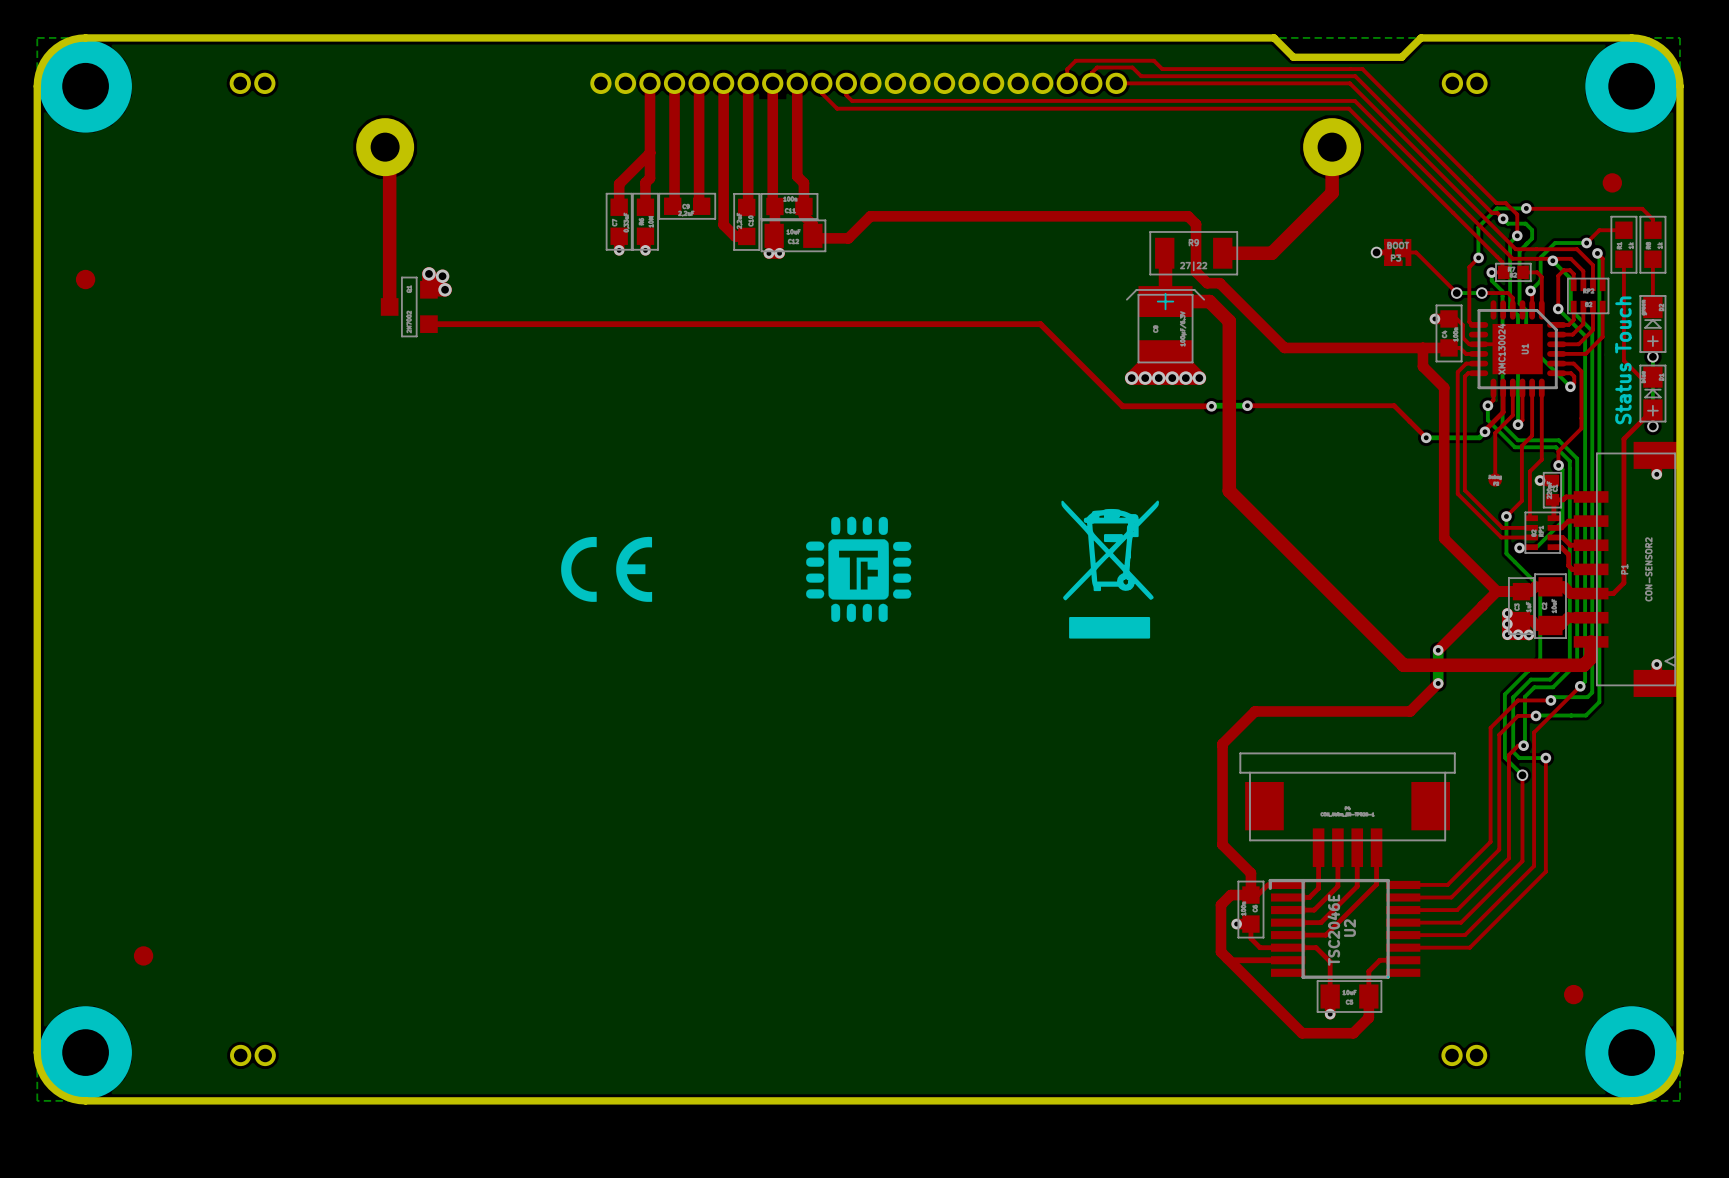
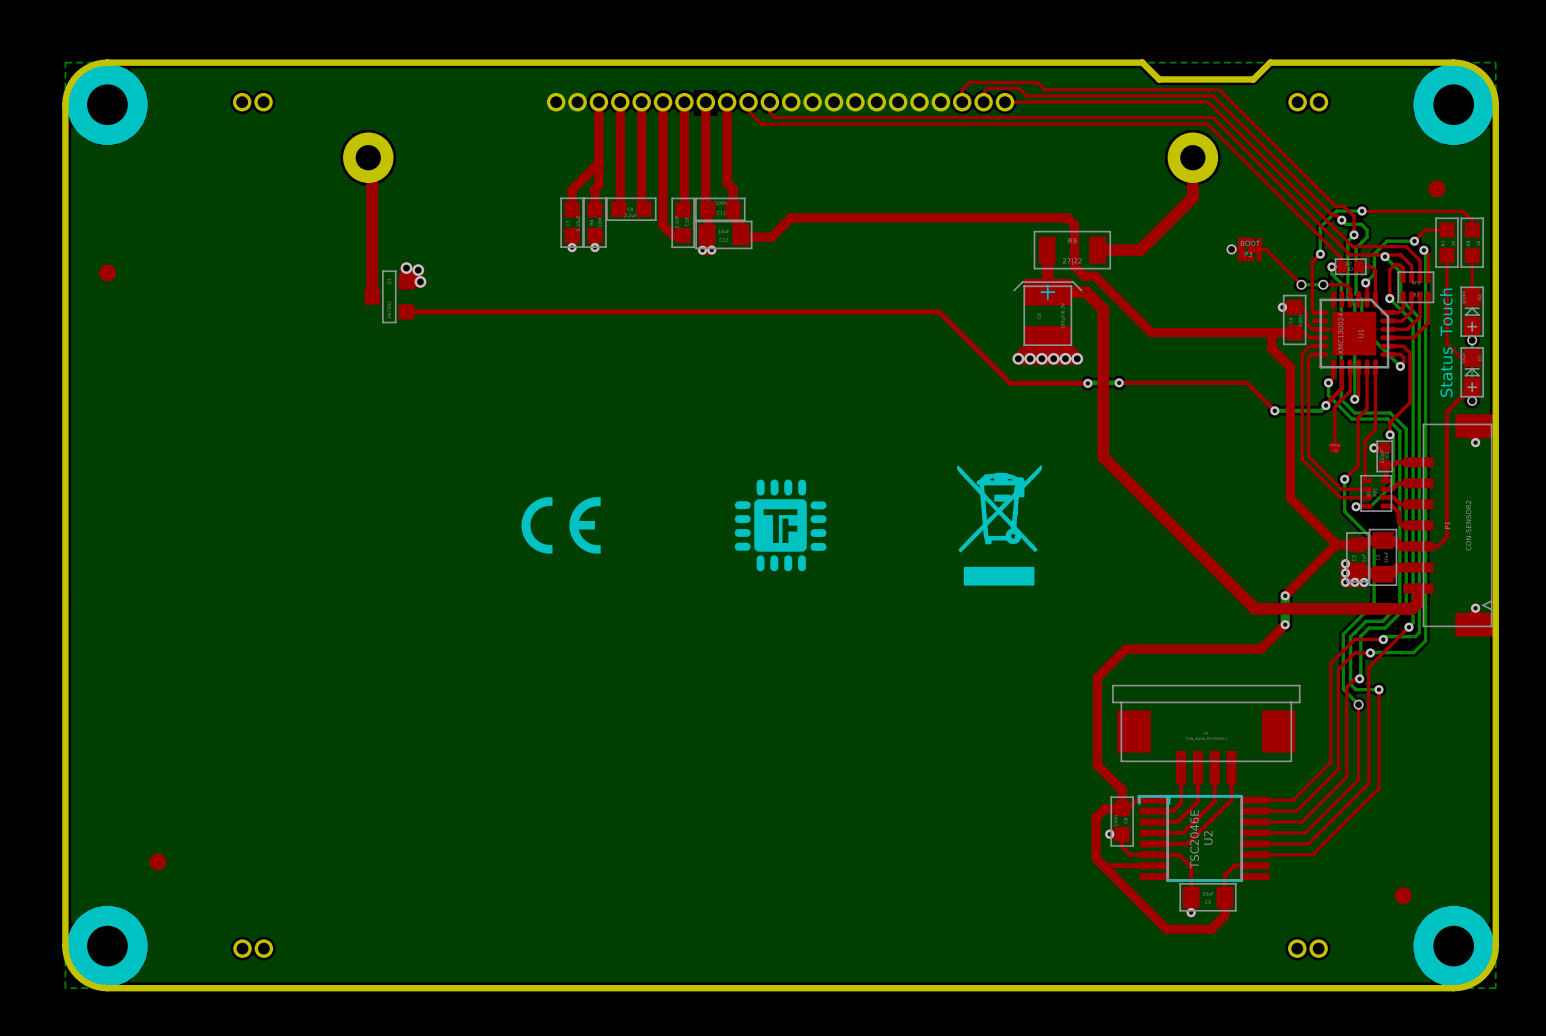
U2 footprint: [1268, 878, 1421, 979] -> [1137, 794, 1270, 882]

